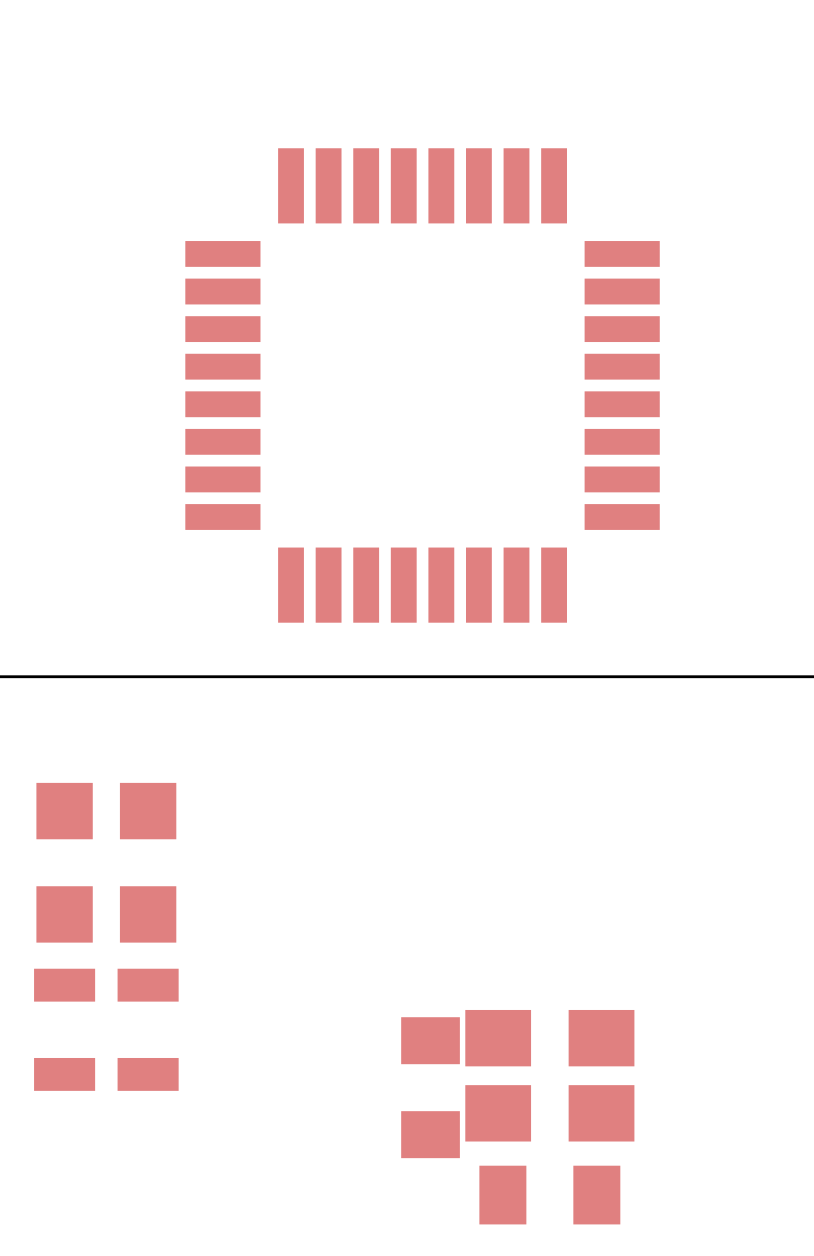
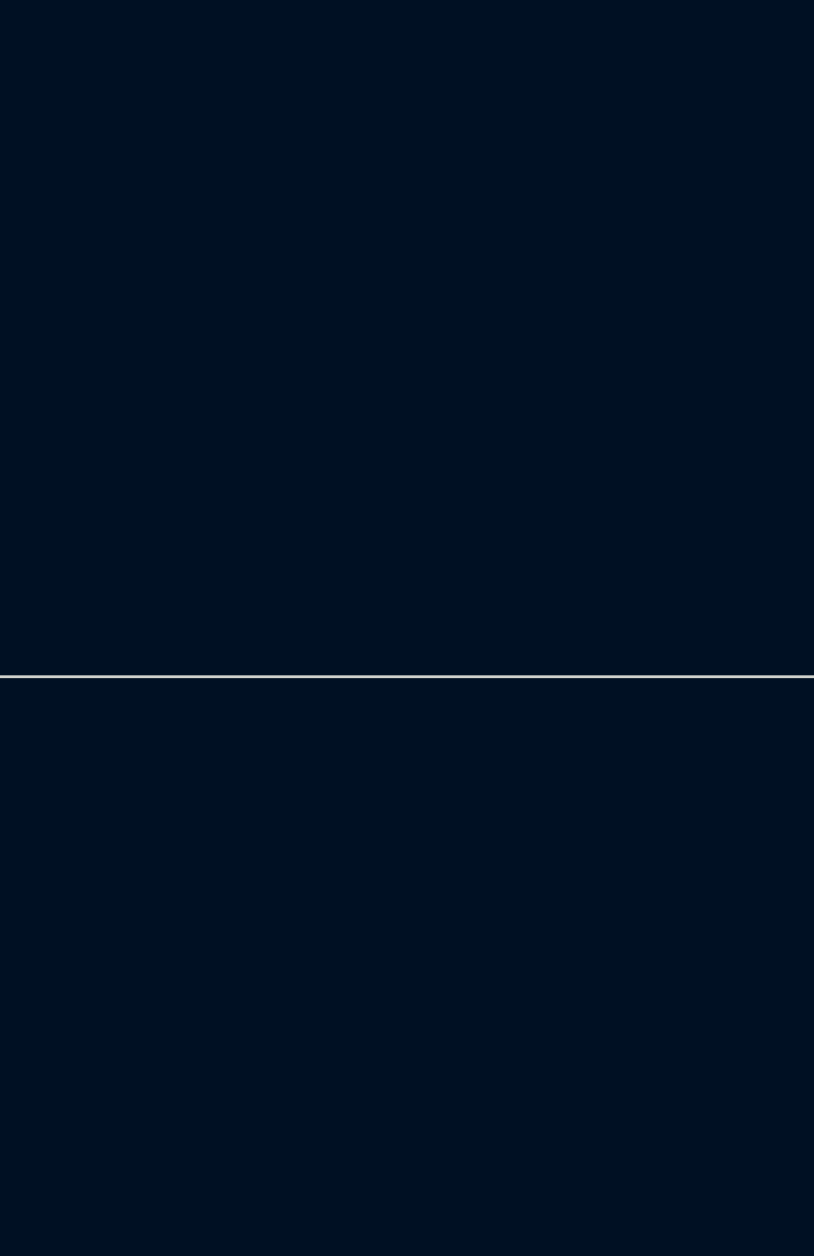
part: (422, 385) -> none
part: (64, 862) -> none
part: (148, 862) -> none
part: (64, 1029) -> none
part: (148, 1029) -> none
part: (549, 1075) -> none
part: (430, 1087) -> none
part: (549, 1195) -> none

